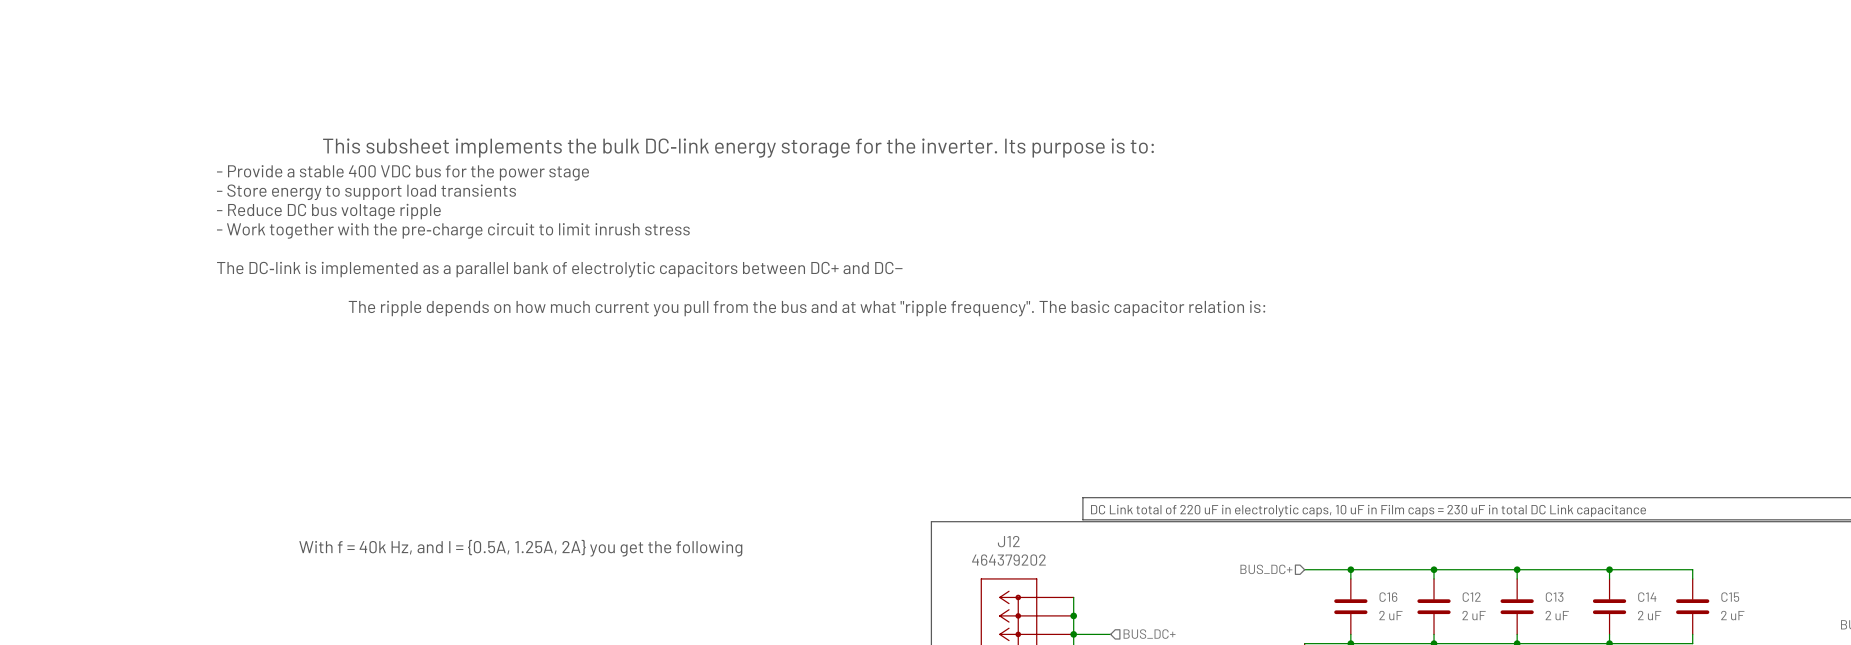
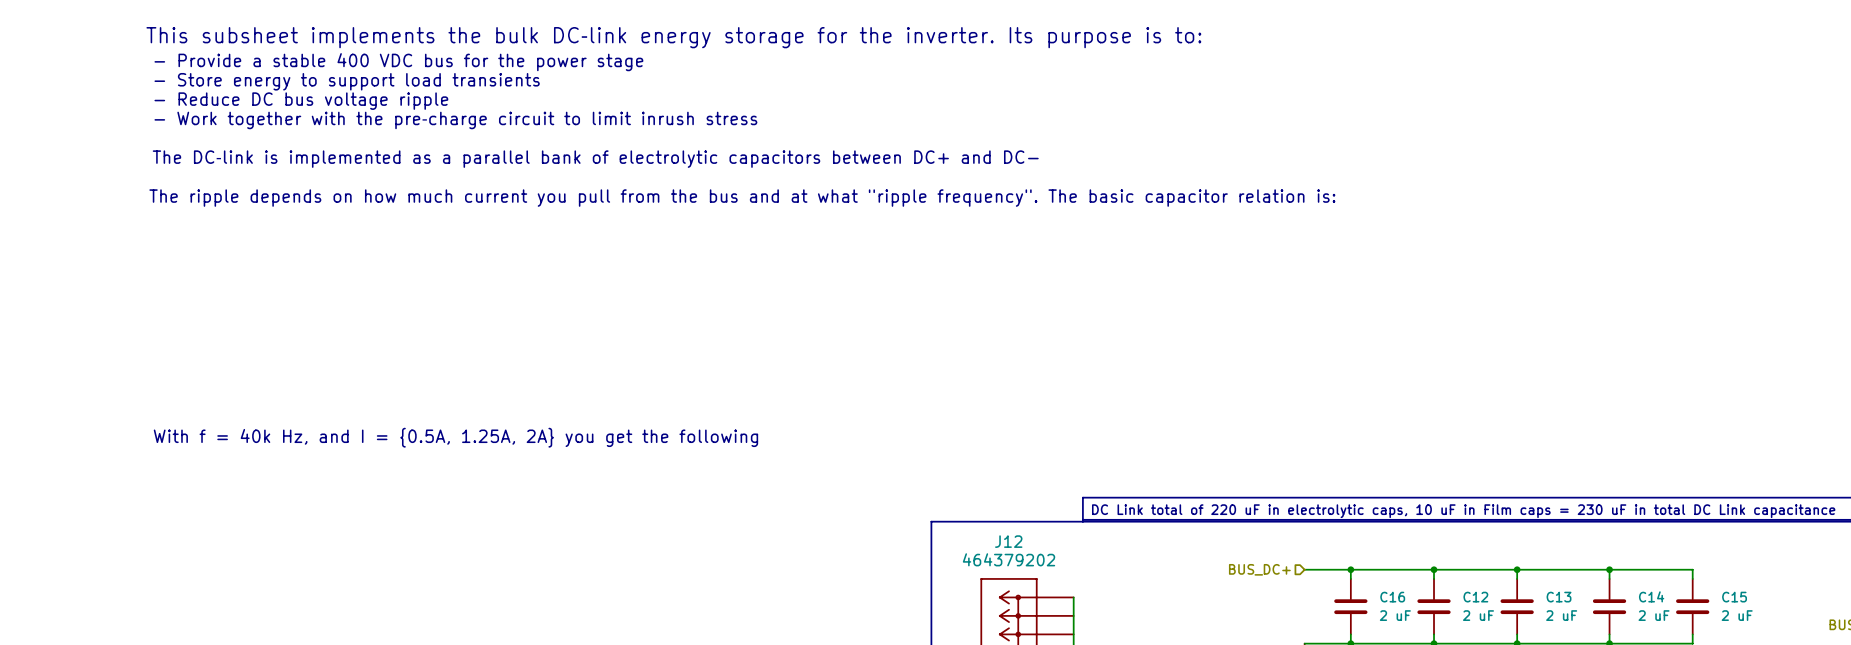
text position: This subsheet implements the bulk DC‑link energy storage for the inverter. Its purpose is to: (738, 148) -> This subsheet implements the bulk DC‑link energy storage for the inverter. Its purpose is to: (673, 37)
text position: - Provide a stable 400 VDC bus for the power stage (402, 172) -> - Provide a stable 400 VDC bus for the power stage (398, 62)
text position: - Store energy to support load transients (366, 192) -> - Store energy to support load transients (347, 81)
text position: - Reduce DC bus voltage ripple (328, 211) -> - Reduce DC bus voltage ripple (301, 101)
text position: - Work together with the pre‑charge circuit to limit inrush stress (453, 230) -> - Work together with the pre‑charge circuit to limit inrush stress (455, 120)
text position: The DC‑link is implemented as a parallel bank of electrolytic capacitors between DC+ and DC− (559, 269) -> The DC‑link is implemented as a parallel bank of electrolytic capacitors between DC+ and DC− (595, 159)
text position: The ripple depends on how much current you pull from the bus and at what "ripple frequency". The basic capacitor relation is: (806, 308) -> The ripple depends on how much current you pull from the bus and at what "ripple frequency". The basic capacitor relation is: (742, 198)
text position: With f = 40k Hz, and I = {0.5A, 1.25A, 2A} you get the following (520, 548) -> With f = 40k Hz, and I = {0.5A, 1.25A, 2A} you get the following (455, 437)
junction: (1073, 615) -> none
wire: (1073, 634) (1110, 634) -> none
junction: (1073, 634) -> none
hierarchical label: BUS_DC+ (1149, 634) -> none

